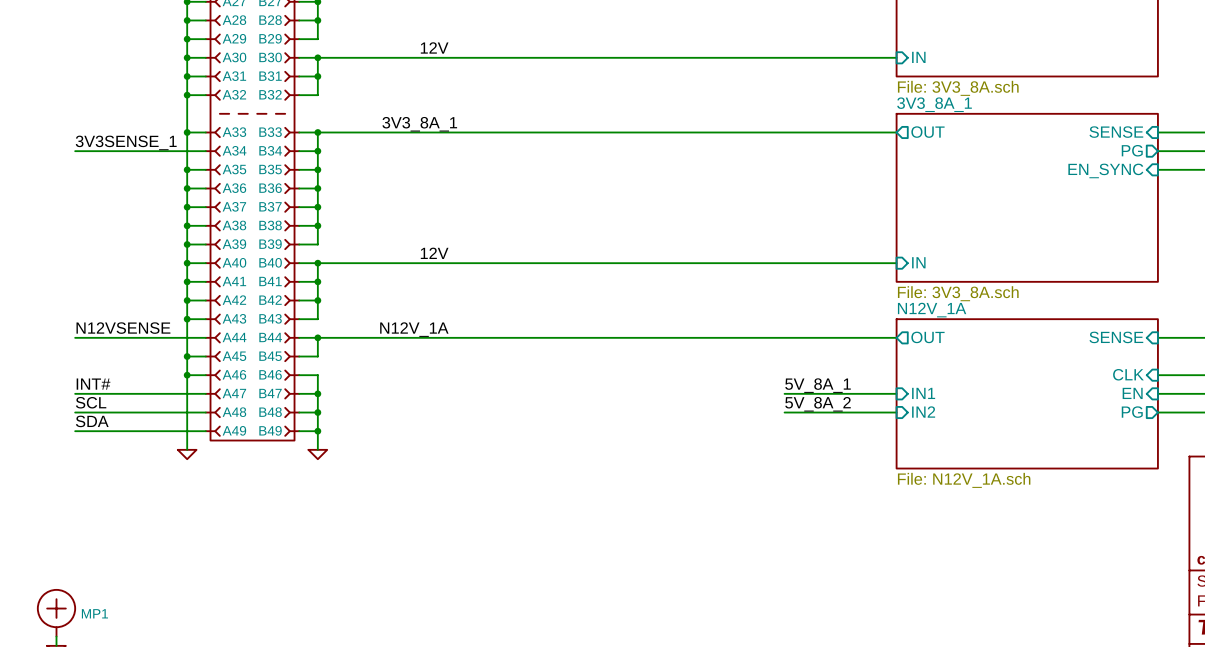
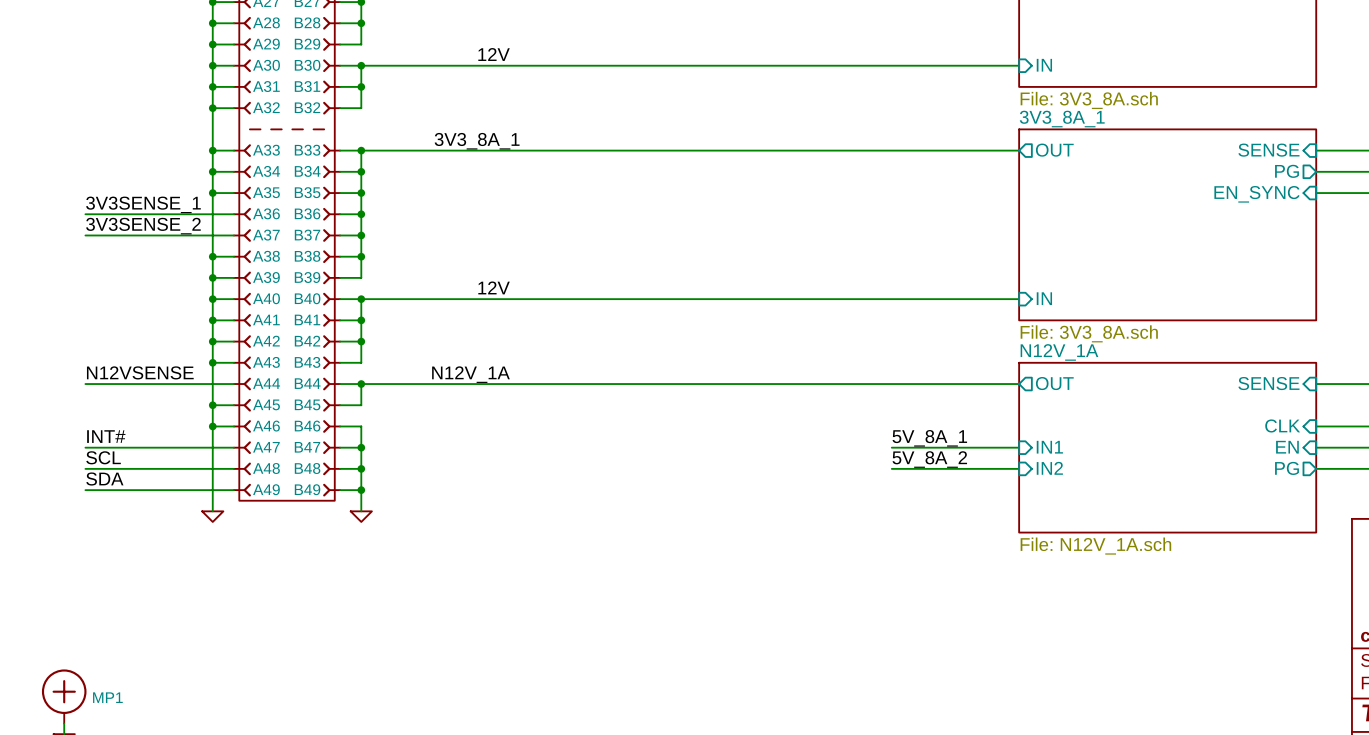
label position: 3V3SENSE_1 (126, 142) -> 3V3SENSE_1 (143, 204)
wire: (75, 151) (187, 151) -> (85, 214) (212, 214)
junction: none -> (212, 171)
junction: (187, 188) -> none
label: none -> 3V3SENSE_2 (143, 226)
wire: none -> (85, 235) (212, 235)
junction: (187, 207) -> none

